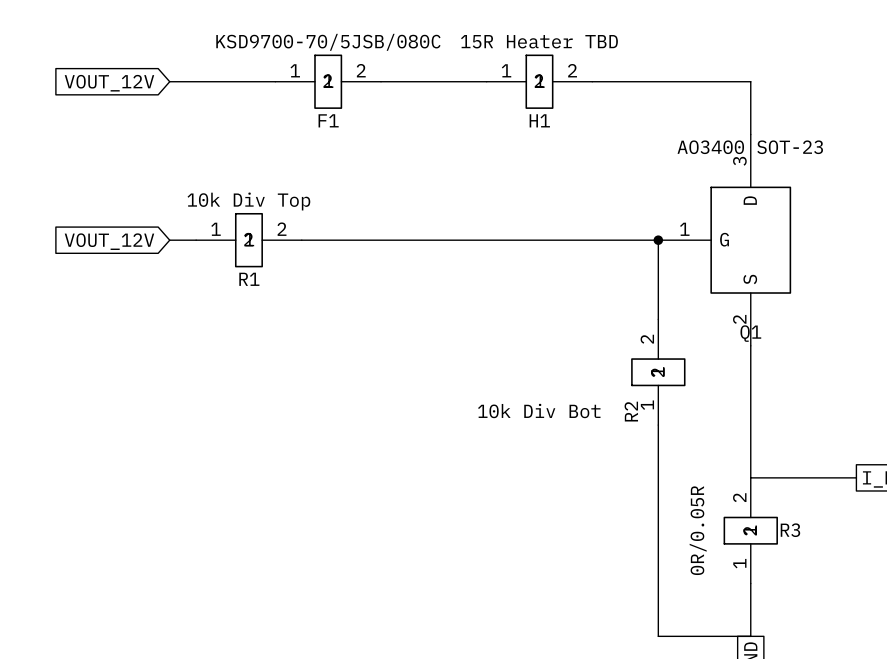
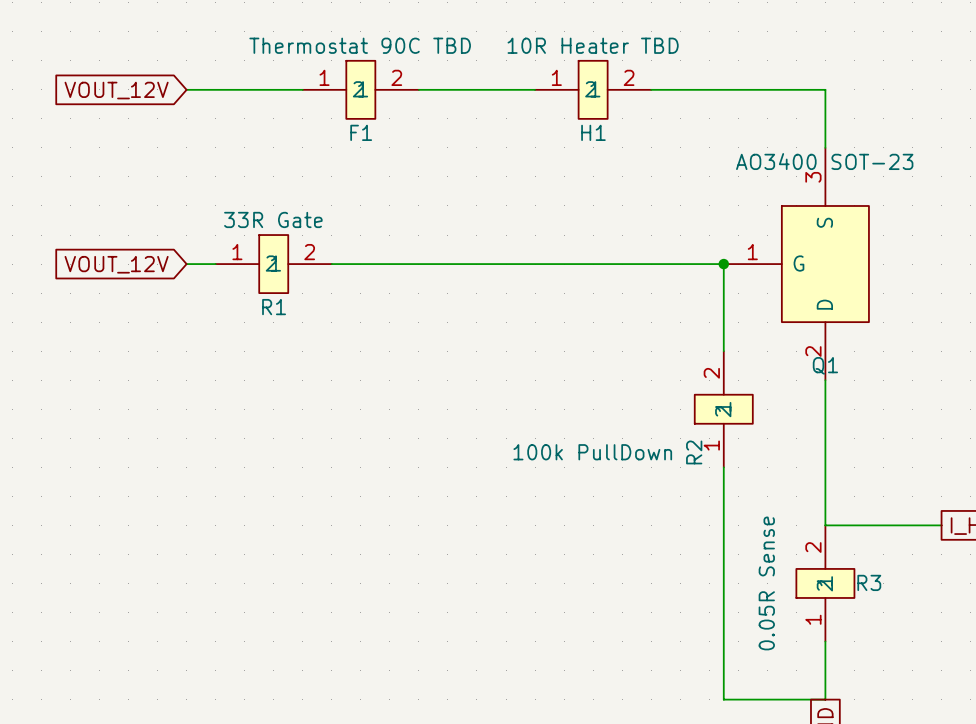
H1 value: 15R Heater TBD (539, 41) -> 10R Heater TBD (593, 45)
F1 value: KSD9700-70/5JSB/080C (328, 42) -> Thermostat 90C TBD (360, 45)
Q1 pin name: D (750, 200) -> S (824, 222)
R1 value: 10k Div Top (248, 201) -> 33R Gate (273, 219)
Q1 pin name: S (750, 279) -> D (824, 304)
R2 value: 10k Div Bot (539, 411) -> 100k PullDown (592, 452)
R3 value: 0R/0.05R (698, 530) -> 0.05R Sense (766, 583)

